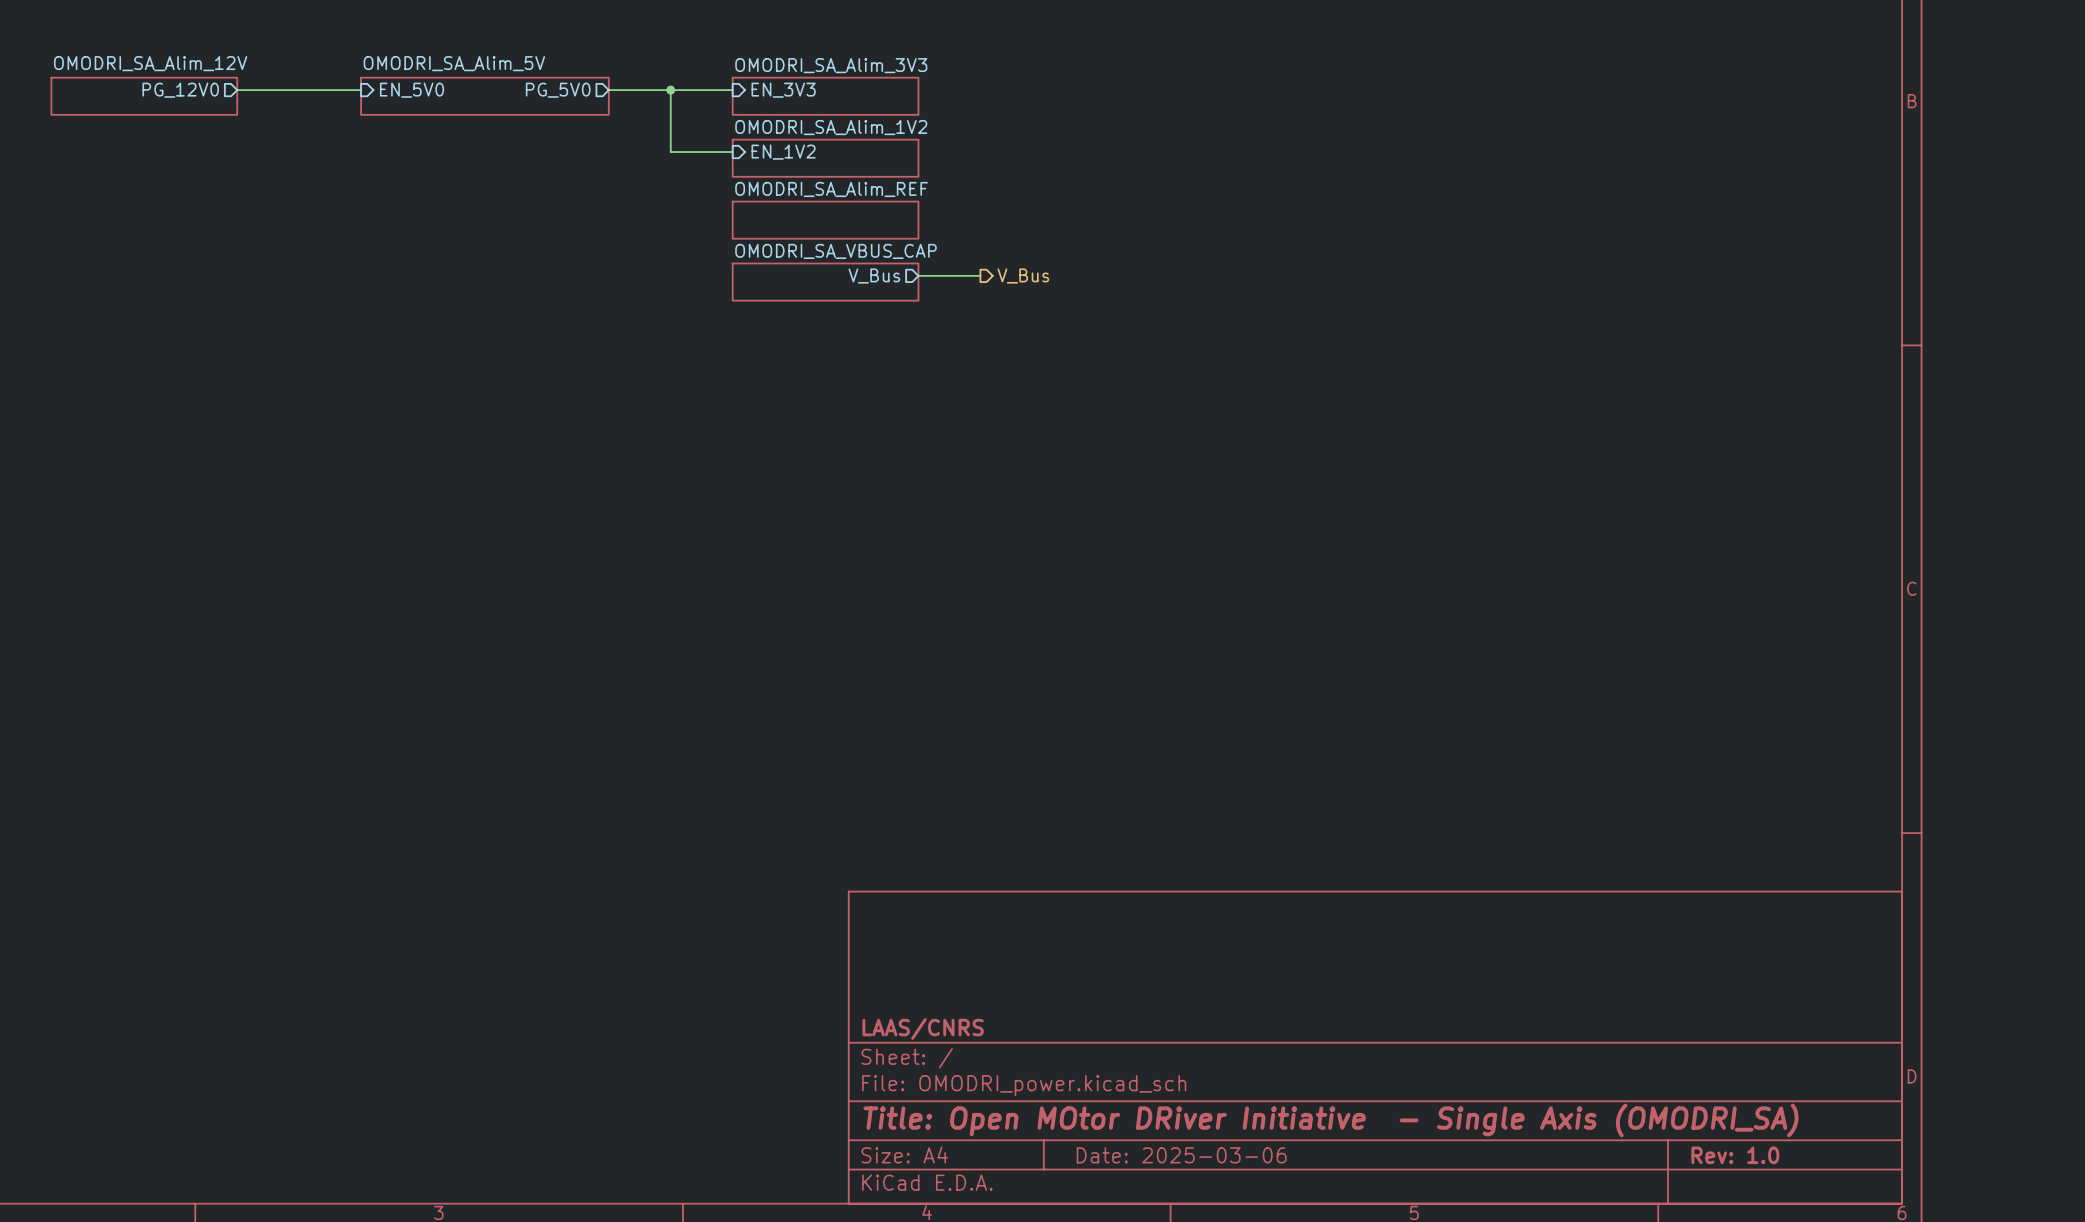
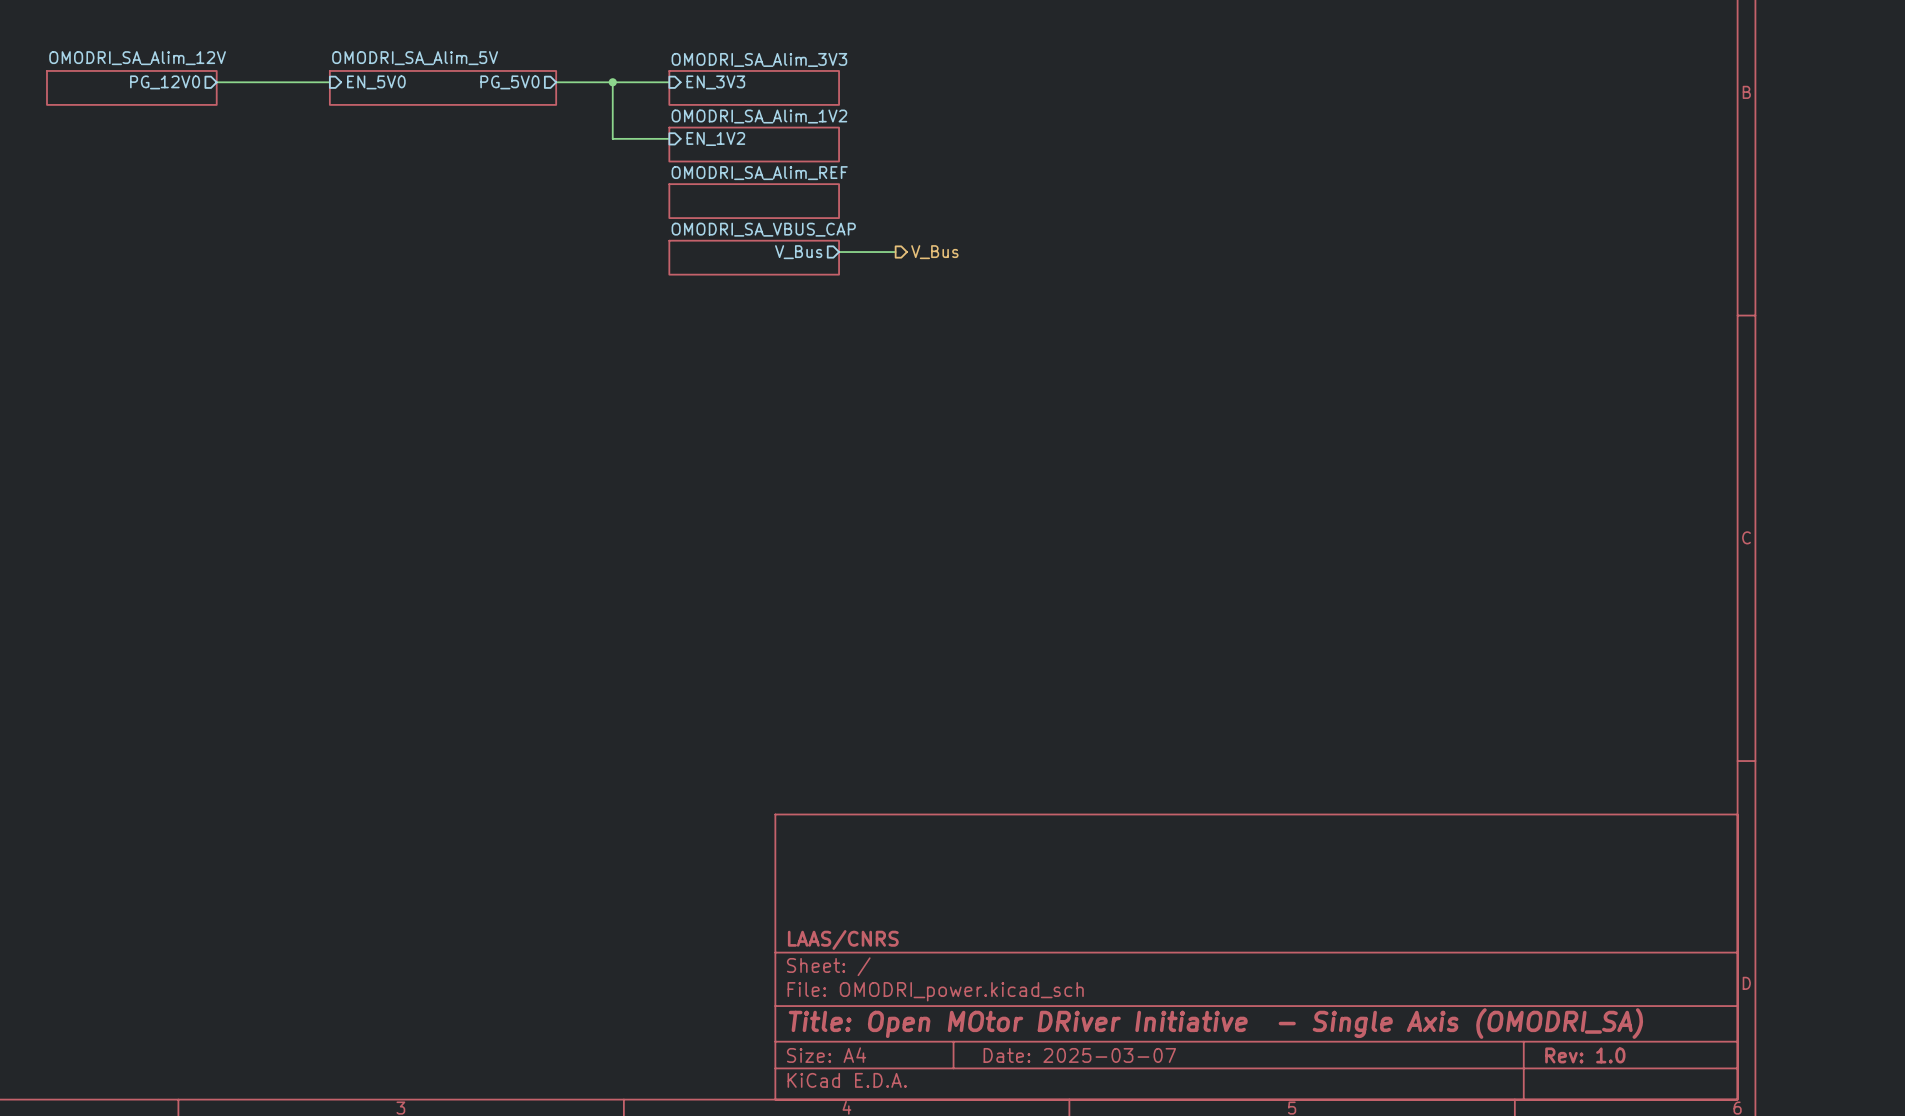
title block: Date: 2025-03-06 (1181, 1155) -> Date: 2025-03-07 (1079, 1055)

